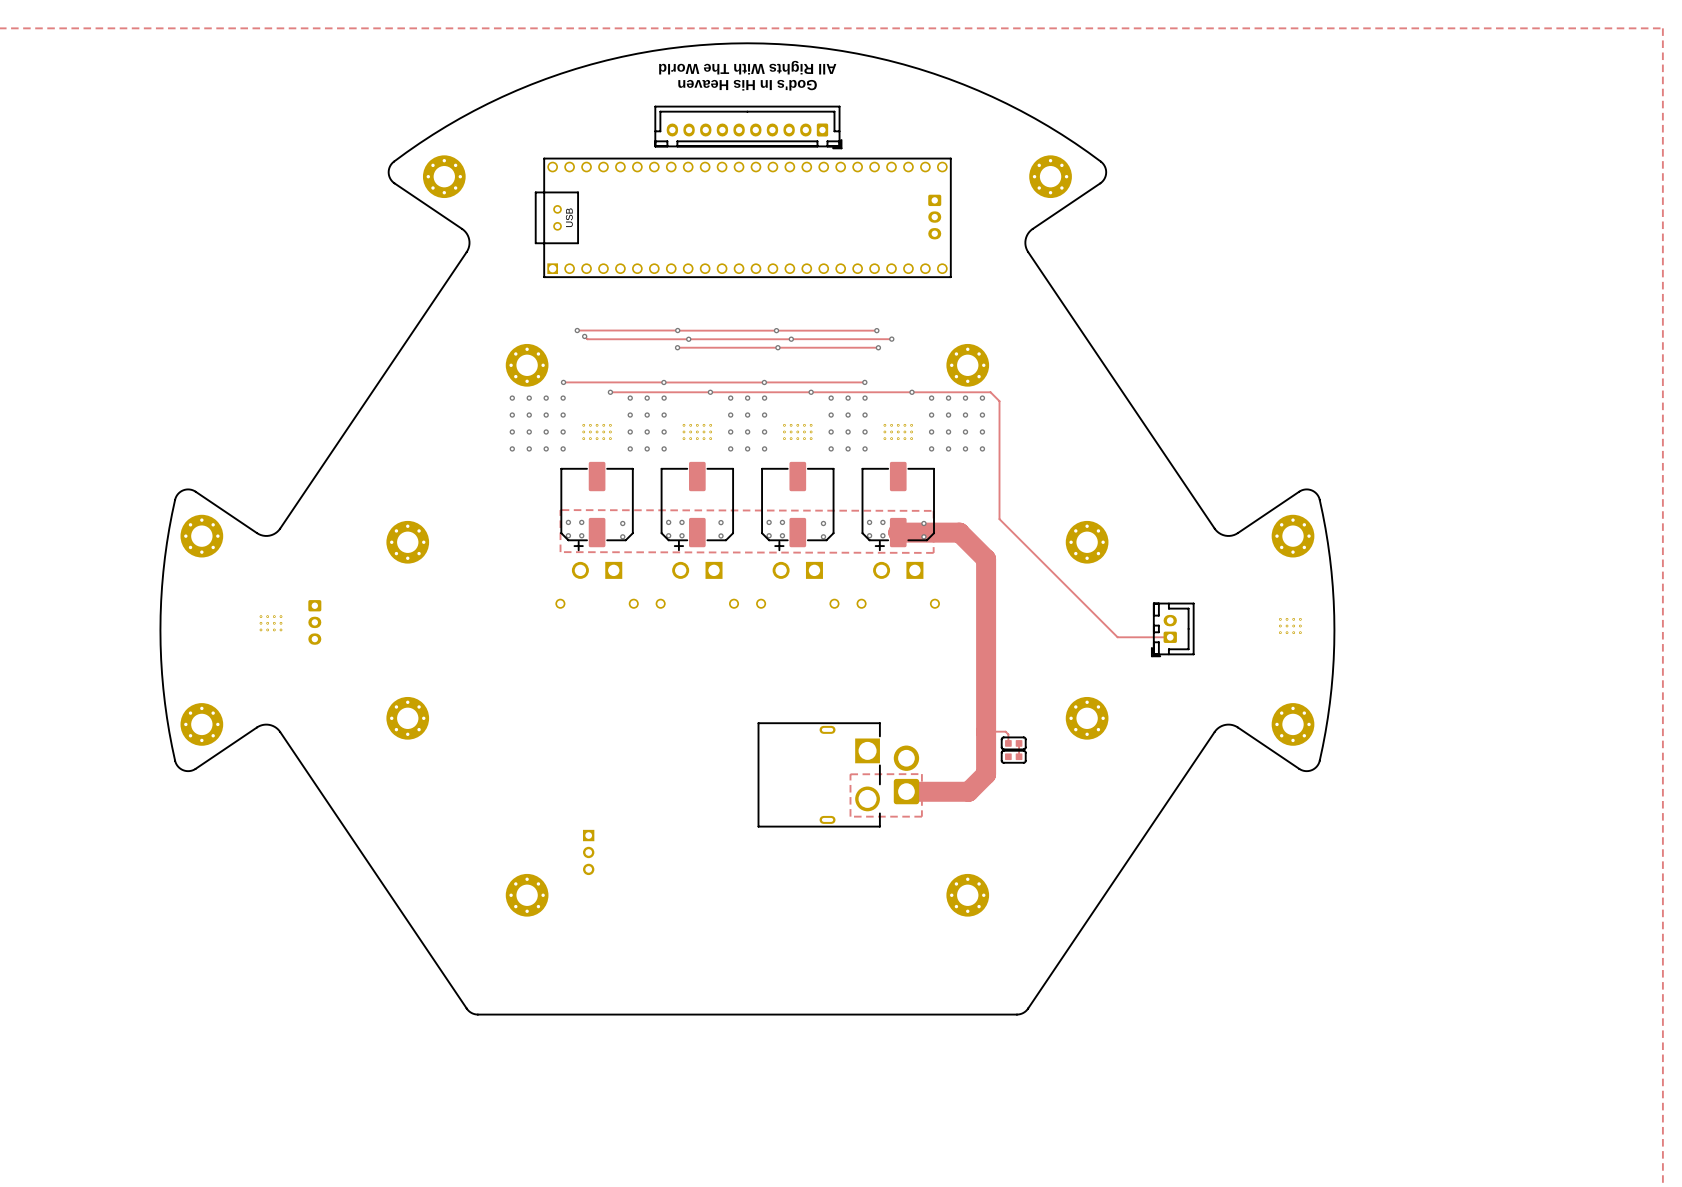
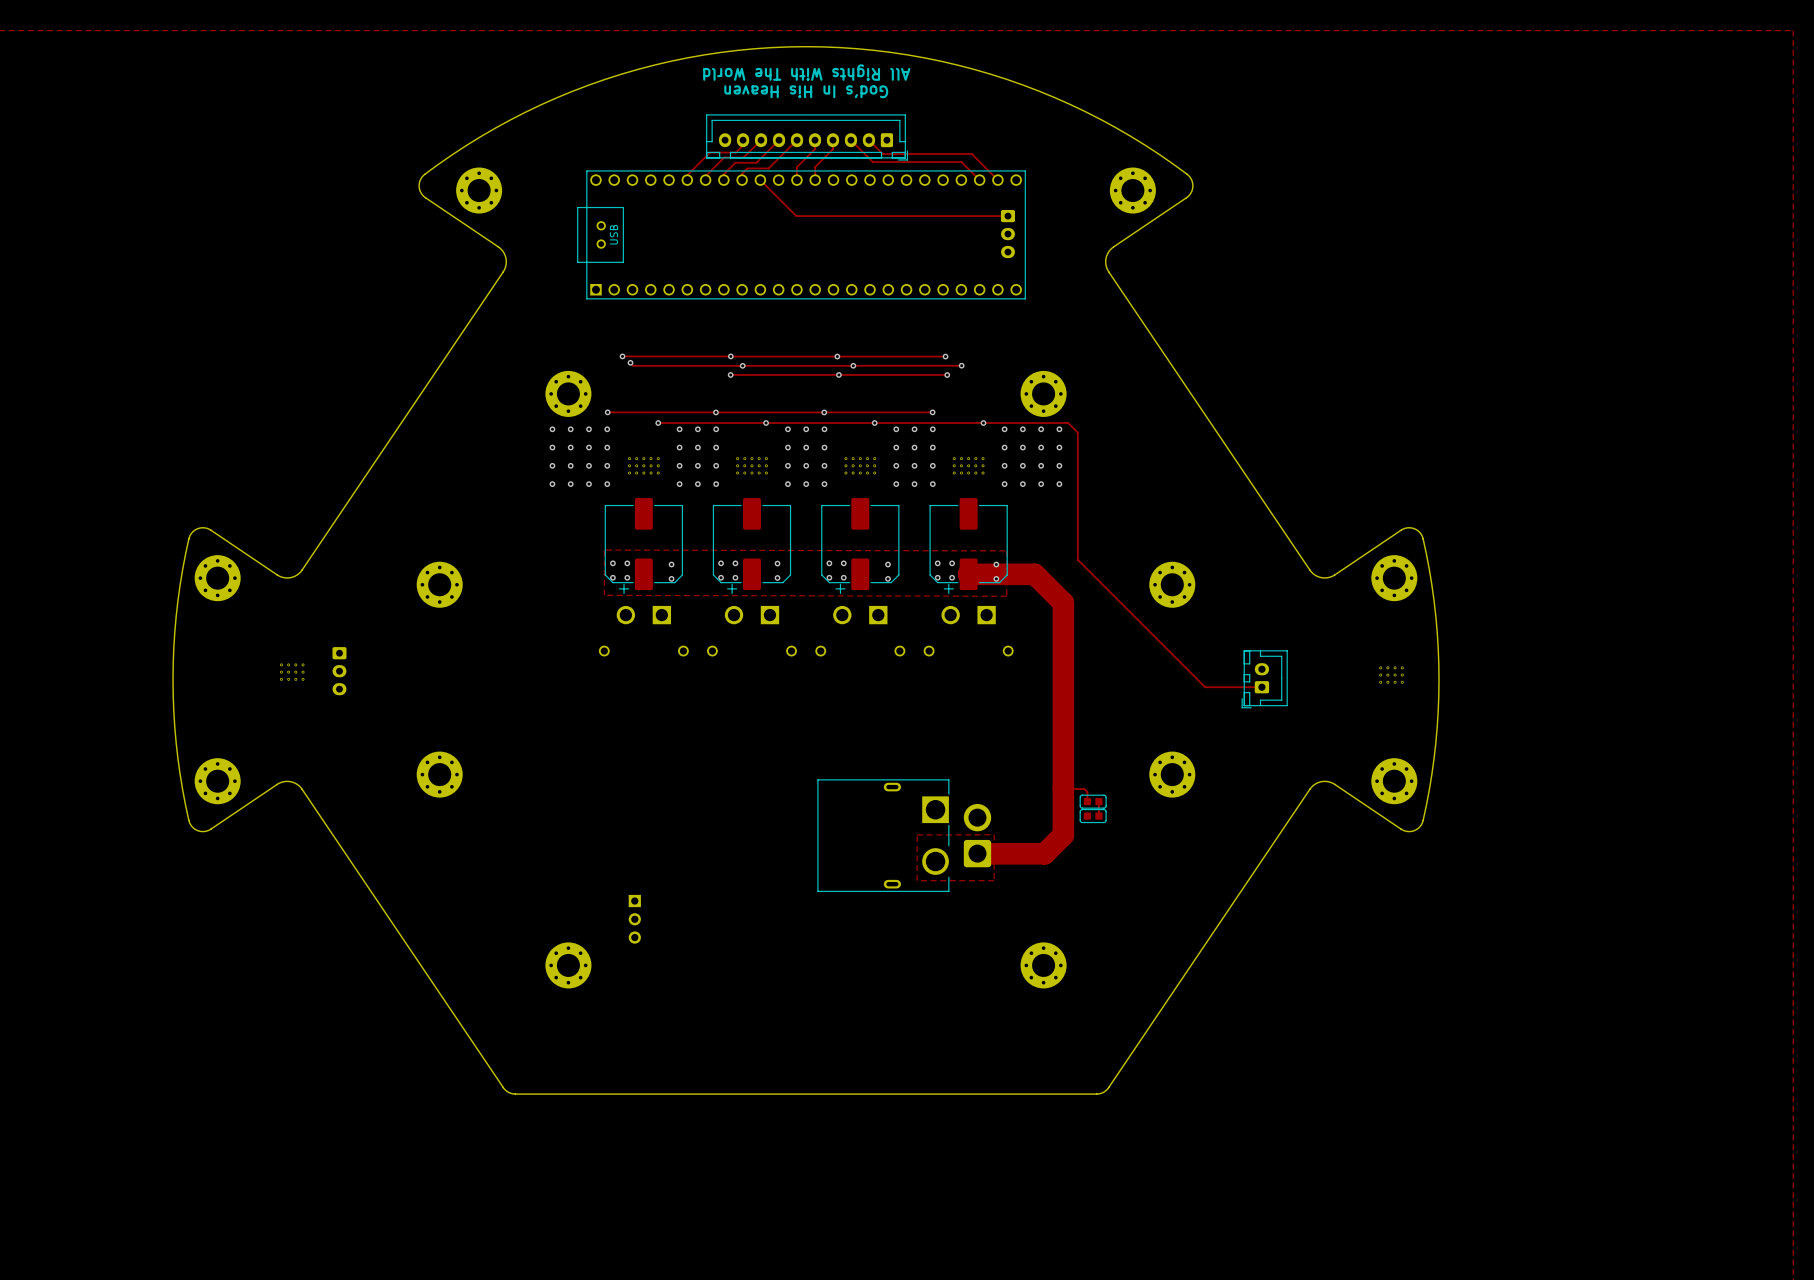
track: none -> (743, 140) (743, 145) (736, 152) (709, 152) (687, 175) (687, 180)
track: none -> (761, 140) (743, 157) (724, 157) (705, 176) (705, 180)
track: none -> (779, 140) (756, 162) (735, 162) (723, 174) (723, 180)
track: none -> (797, 140) (768, 168) (747, 168) (742, 173) (742, 180)
track: none -> (814, 140) (814, 149) (796, 167) (796, 180)
track: none -> (832, 140) (832, 149) (815, 166) (815, 180)
track: none -> (850, 140) (872, 162) (961, 162) (979, 180)
track: none -> (868, 140) (882, 154) (971, 154) (997, 180)
track: none -> (760, 180) (796, 216) (1007, 216)

